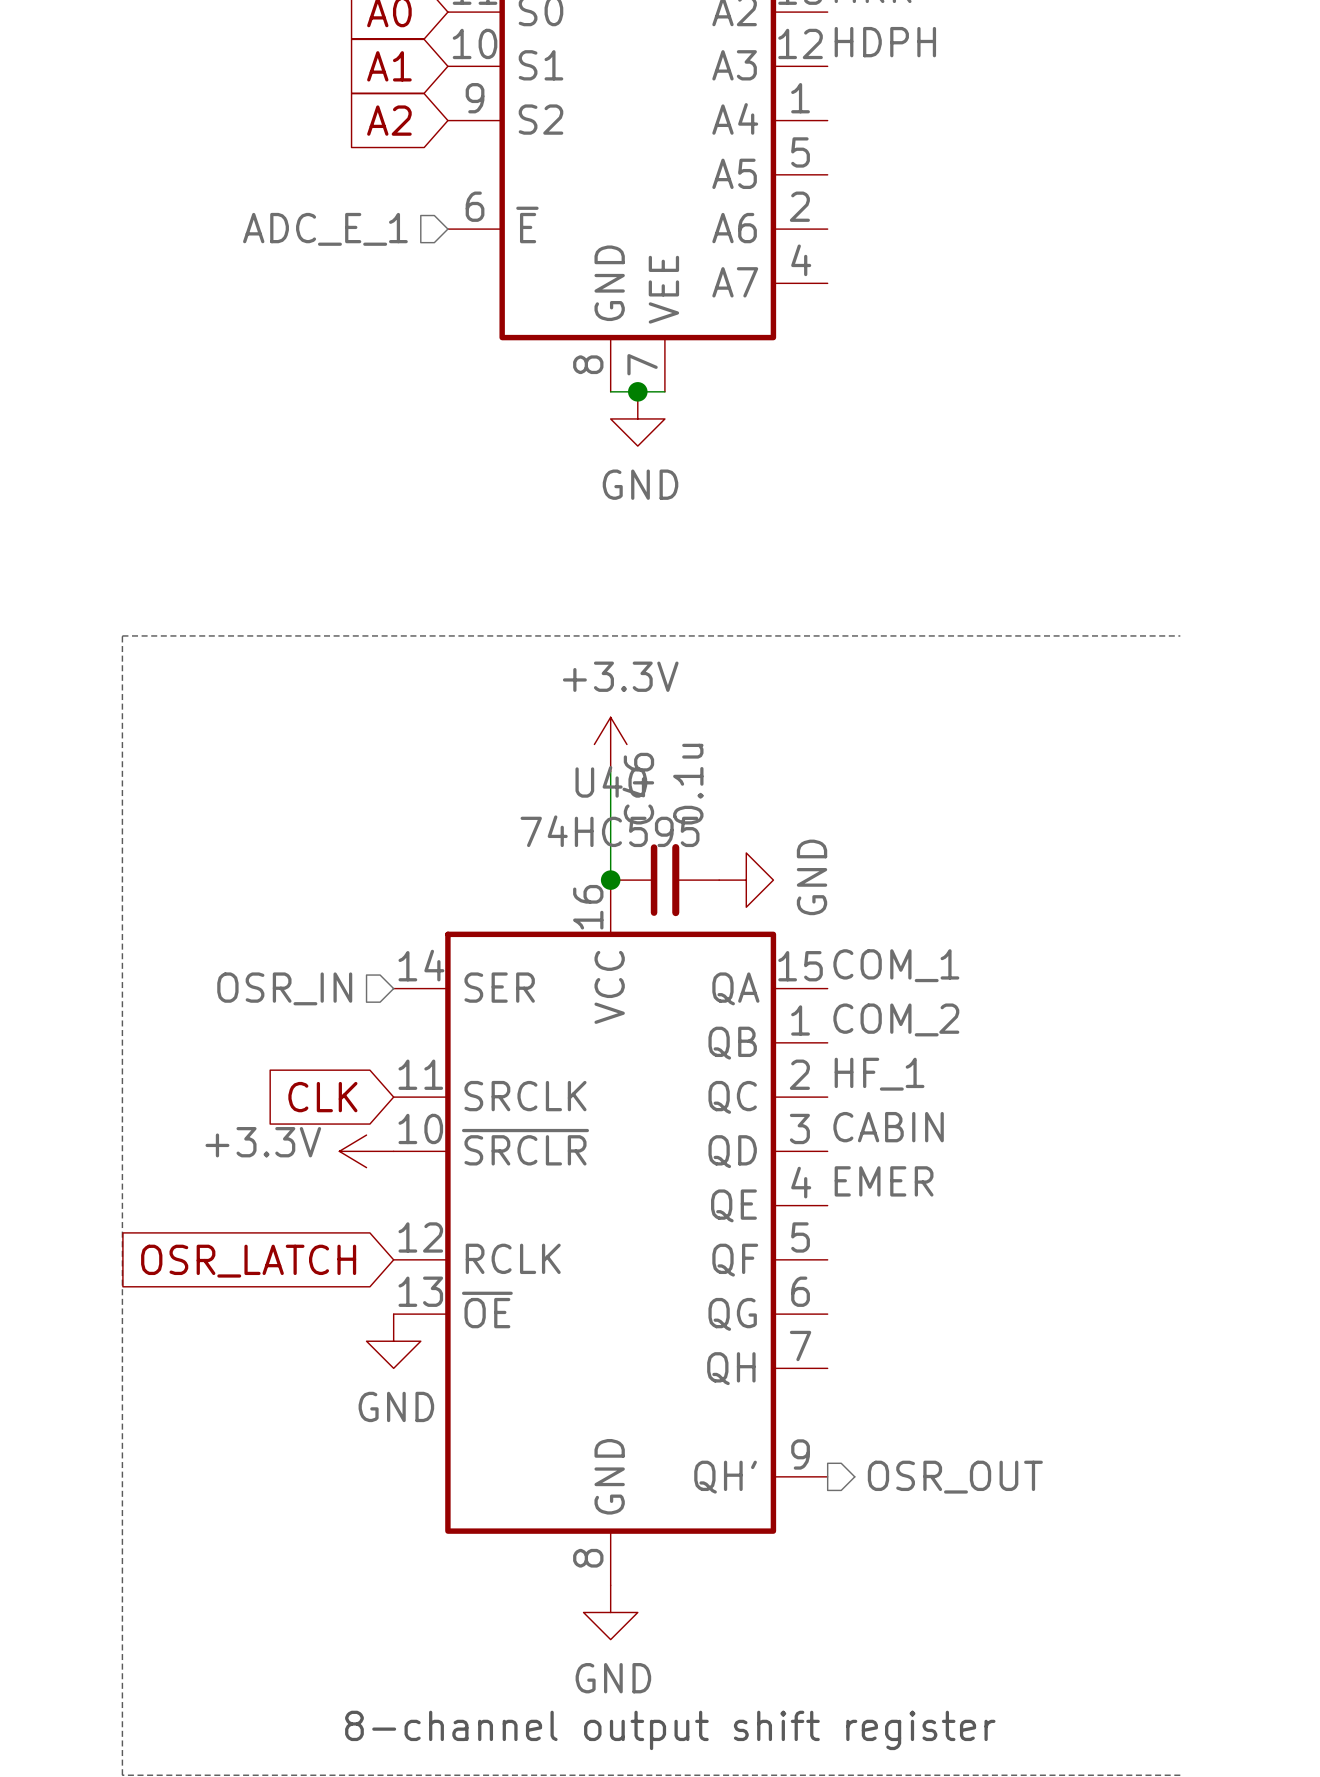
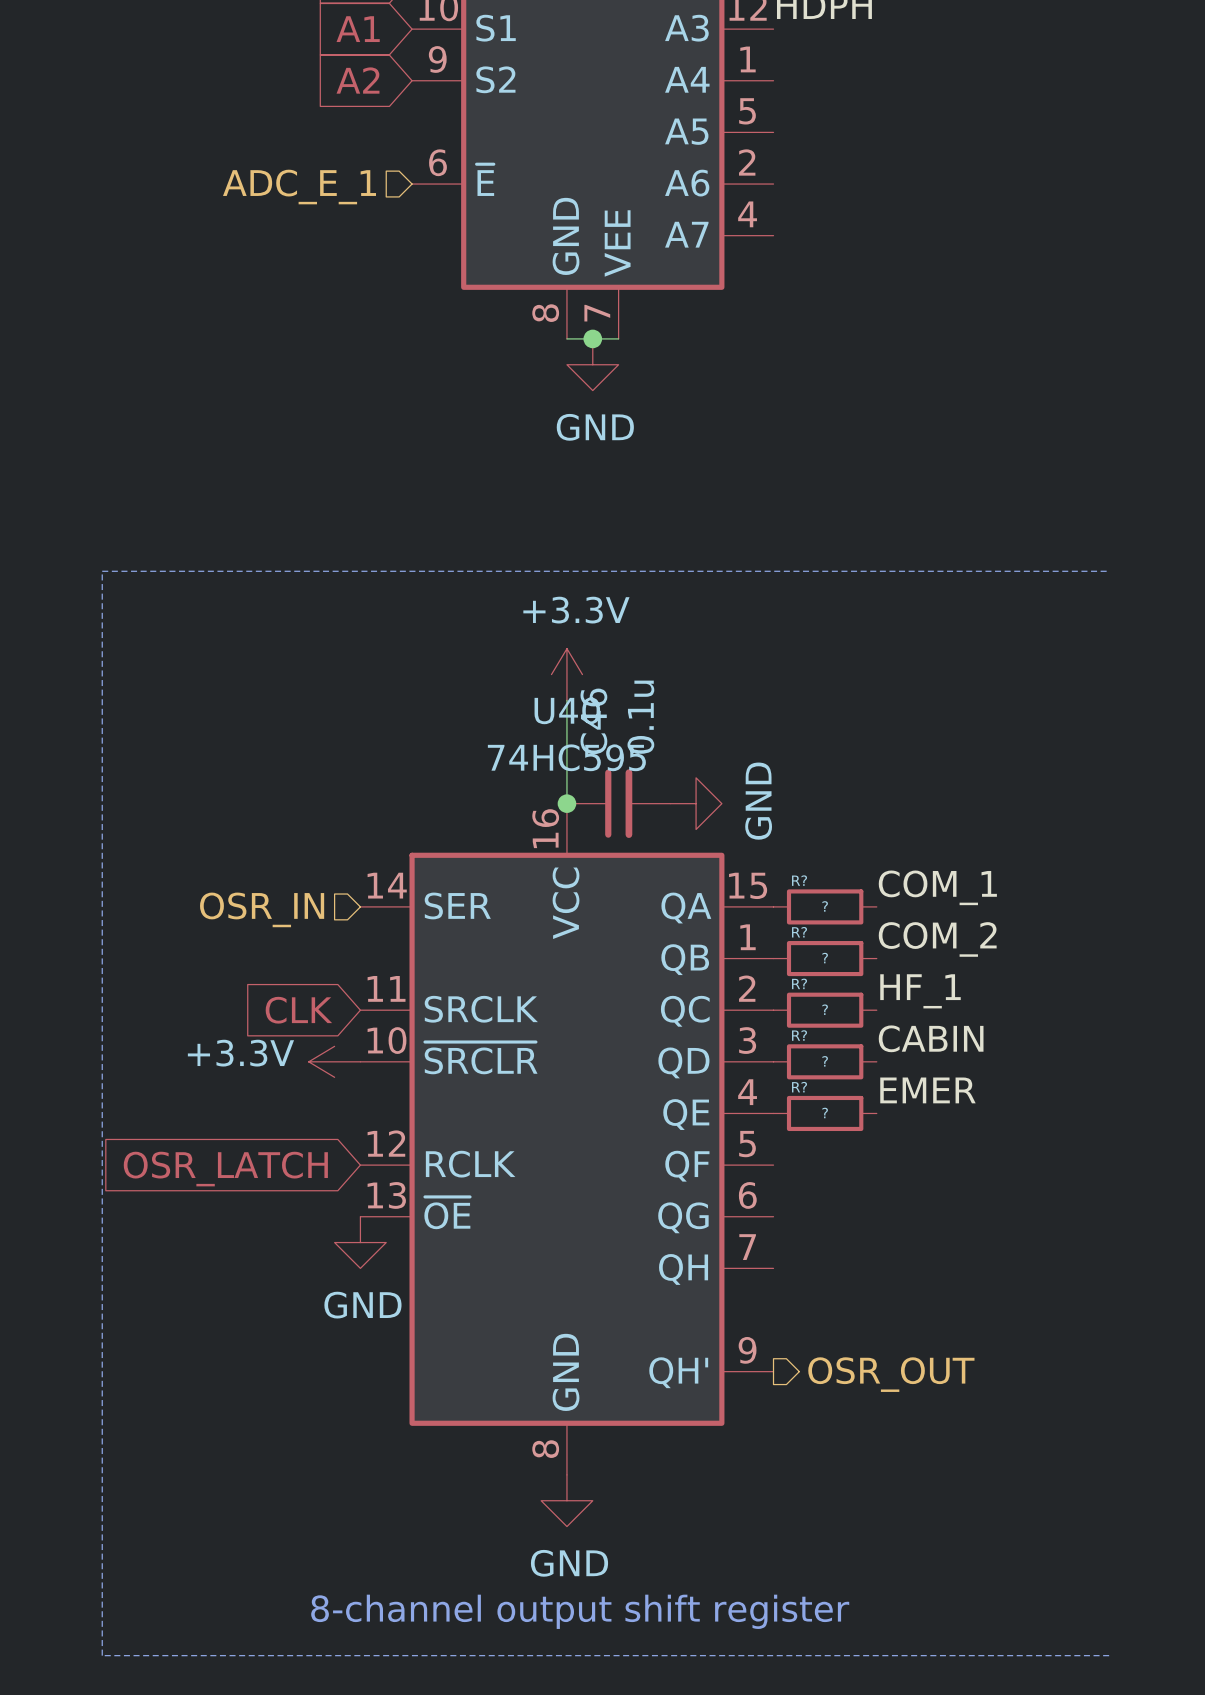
label position: COM_1 (896, 965) -> COM_1 (937, 887)
R?: none -> ? (825, 906)
label position: COM_2 (896, 1019) -> COM_2 (937, 939)
R?: none -> ? (825, 958)
label position: HF_1 (879, 1074) -> HF_1 (920, 991)
R?: none -> ? (825, 1010)
label position: CABIN (888, 1127) -> CABIN (931, 1038)
R?: none -> ? (825, 1061)
label position: EMER (884, 1181) -> EMER (927, 1090)
R?: none -> ? (825, 1113)

